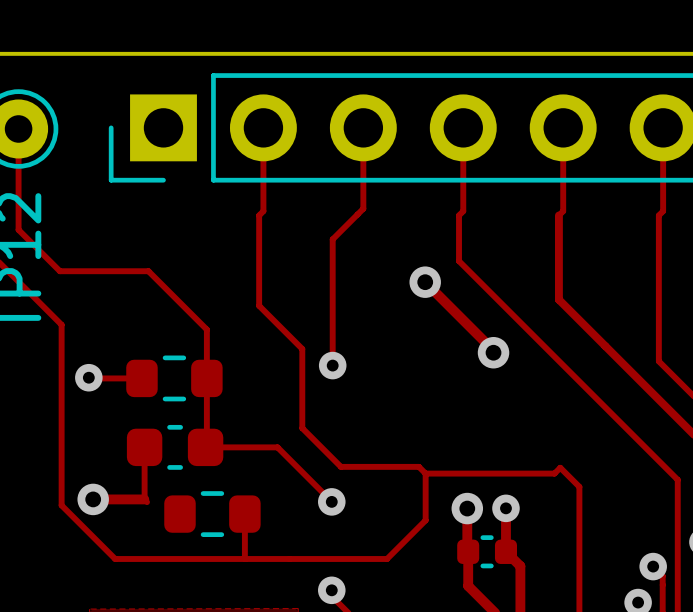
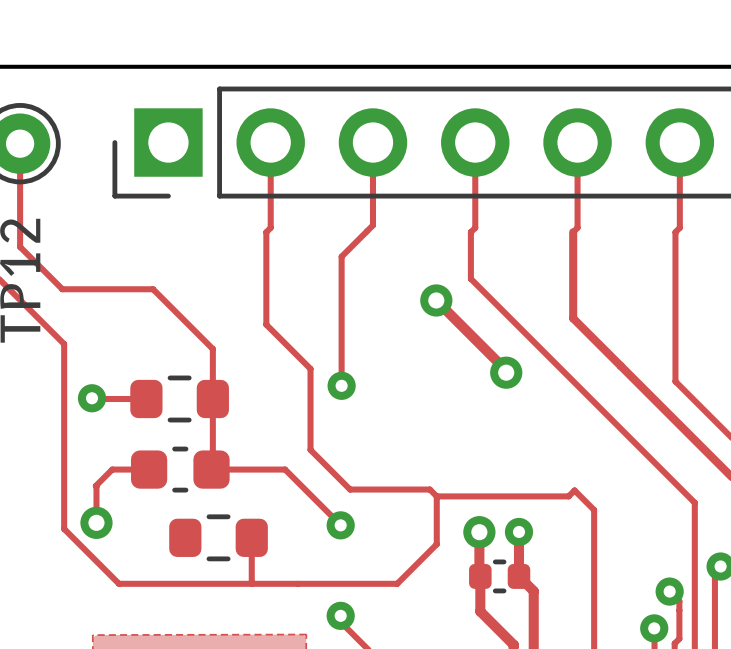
track: (144, 447) (144, 499) -> (149, 469) (112, 469) (95, 485) (96, 522)
track: (93, 499) (144, 499) (147, 502) -> none

